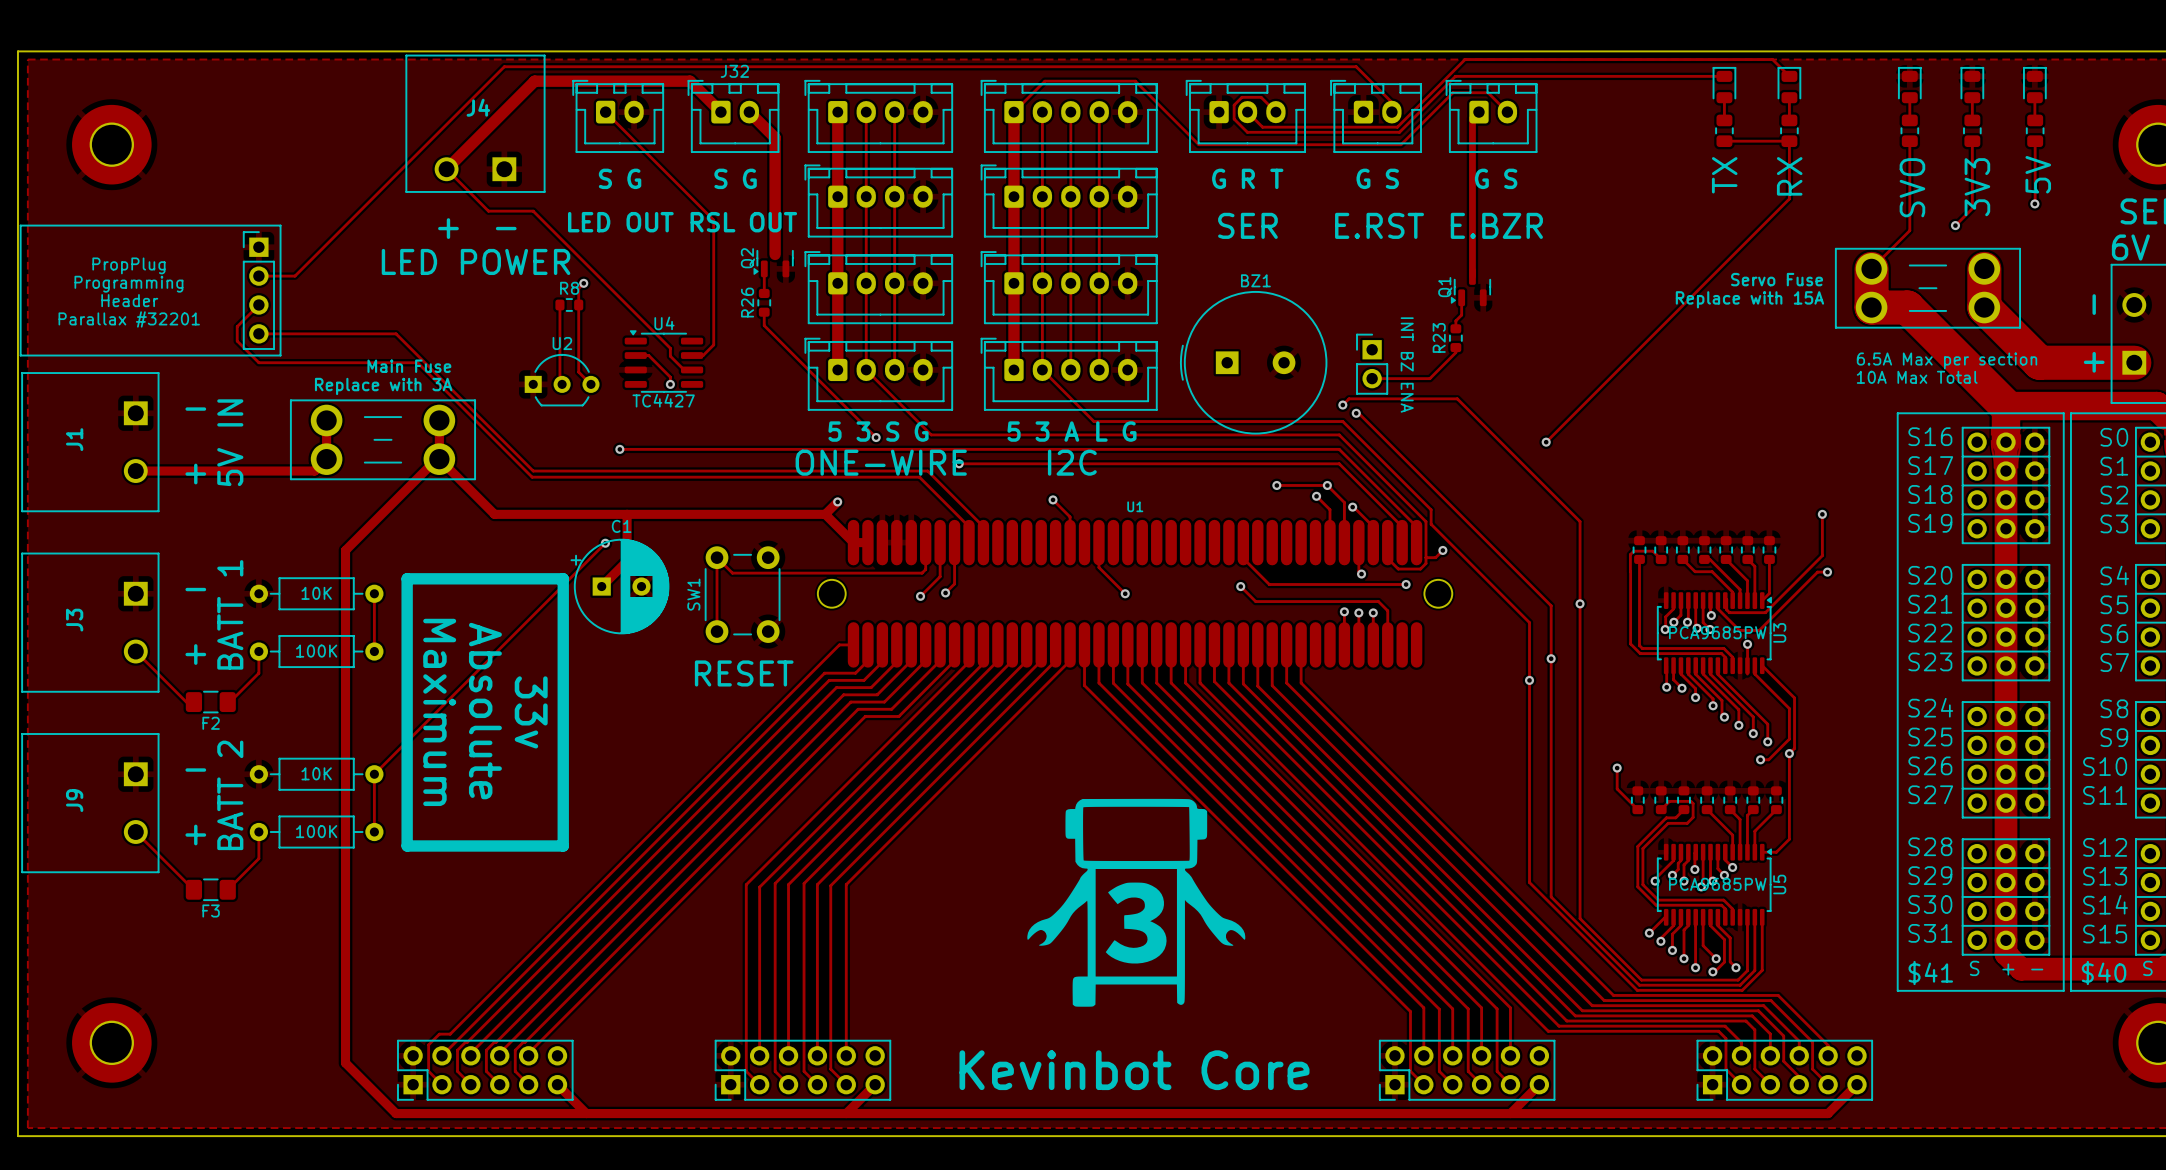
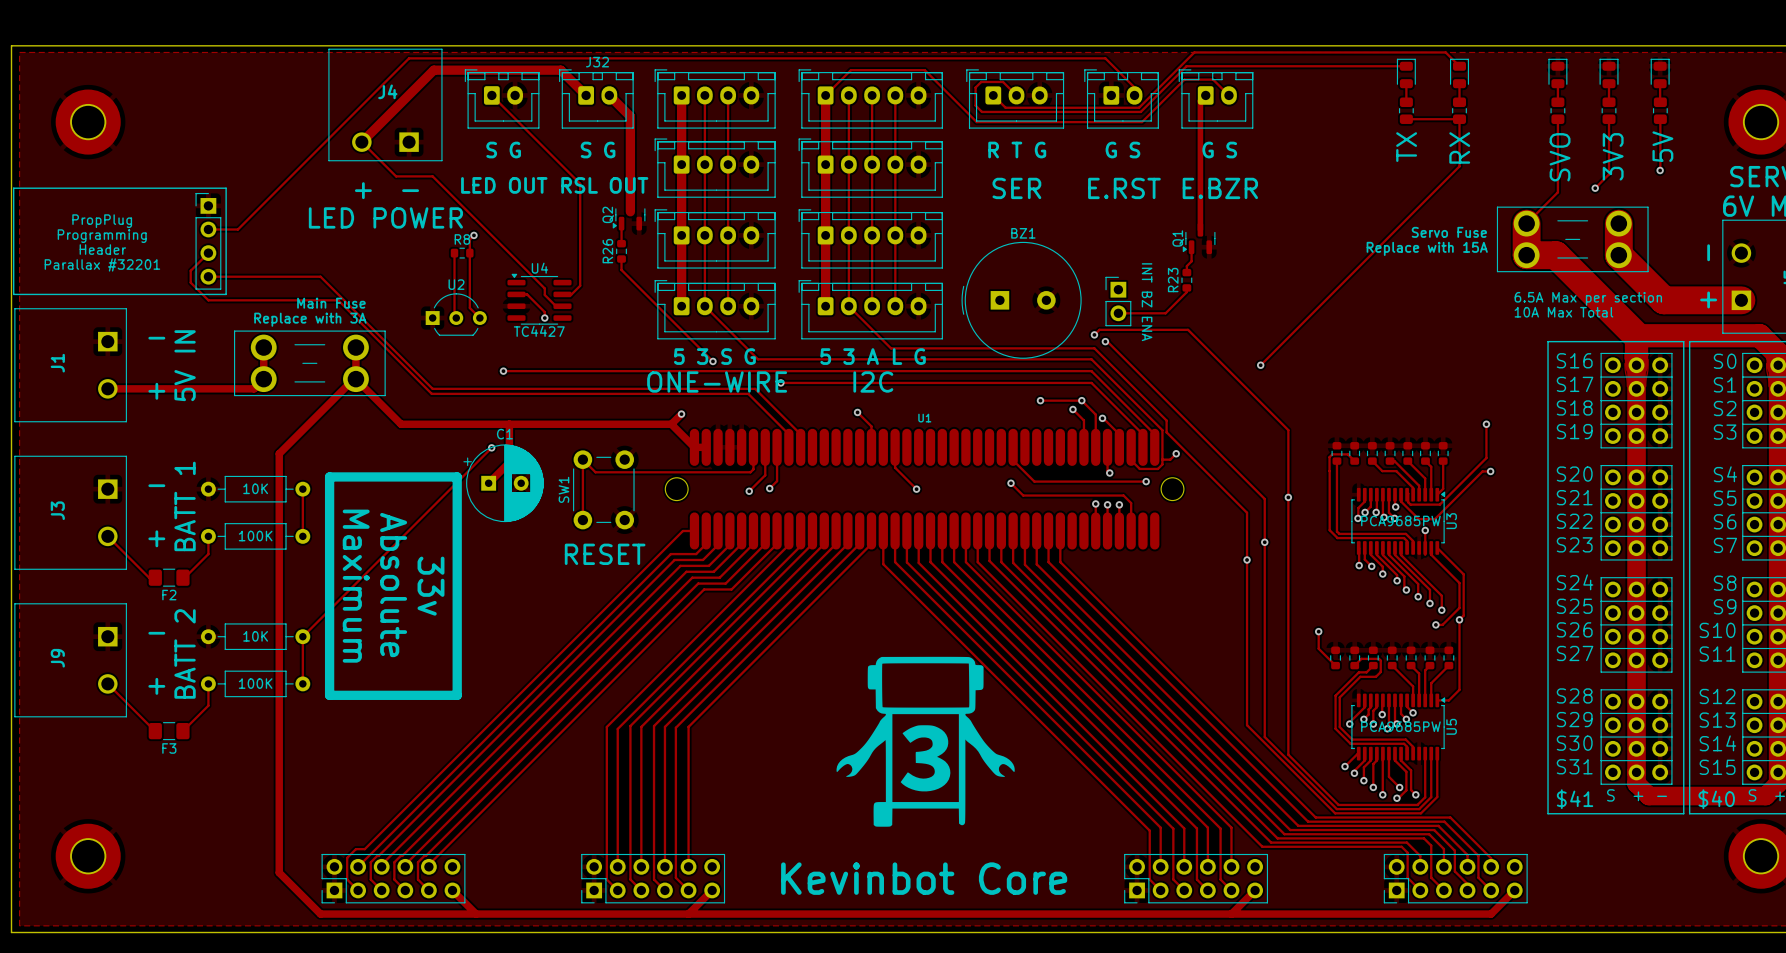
track: none -> (993, 95) (1005, 107) (1028, 107)
track: (1247, 112) (1262, 127) -> (1016, 95) (1003, 81) (981, 81) (975, 87) (975, 105) (981, 111) (1016, 111)
track: (1275, 112) (1261, 97) (1241, 97) (1234, 105) (1234, 119) (1247, 132) -> none
text: G (1219, 178) -> R (993, 150)
text: R (1248, 178) -> T (1016, 150)
text: T (1276, 178) -> G (1040, 150)

